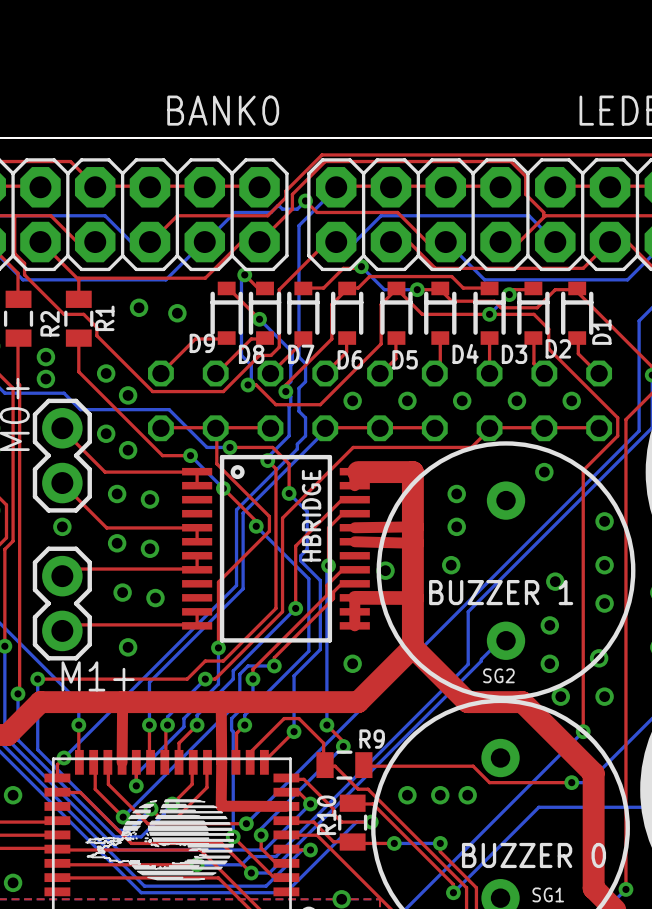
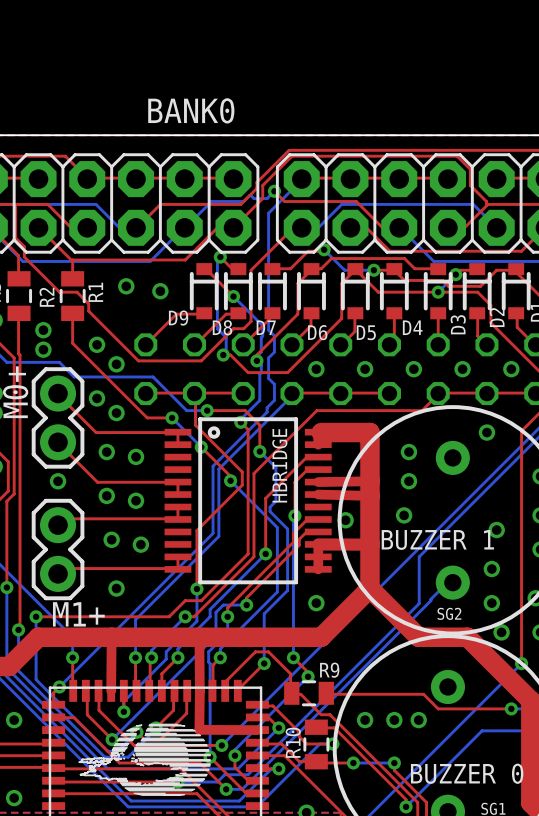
D2 name rotation: 0° (558, 348) -> 90° counterclockwise (497, 317)
D3 name rotation: 0° (514, 354) -> 90° counterclockwise (458, 324)

